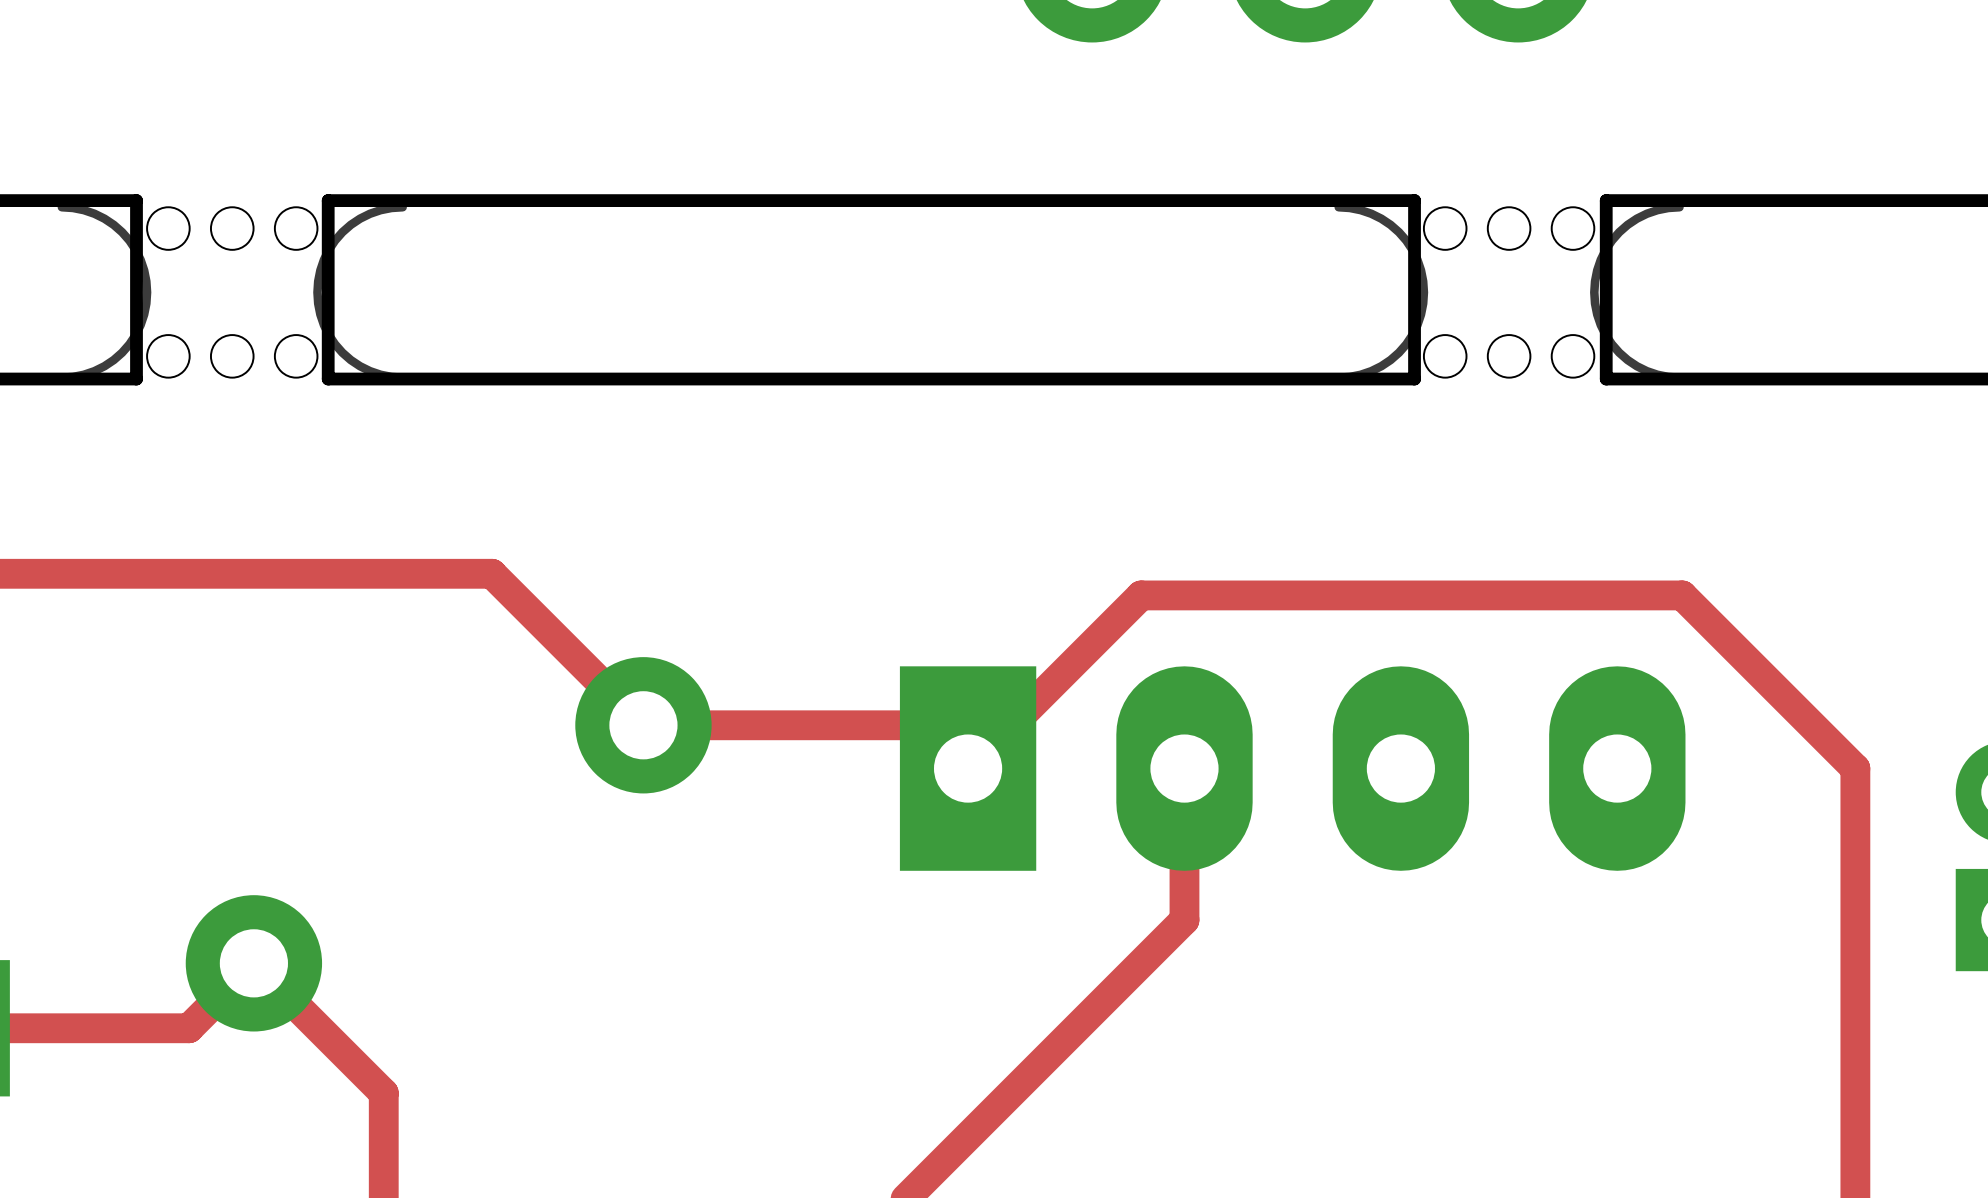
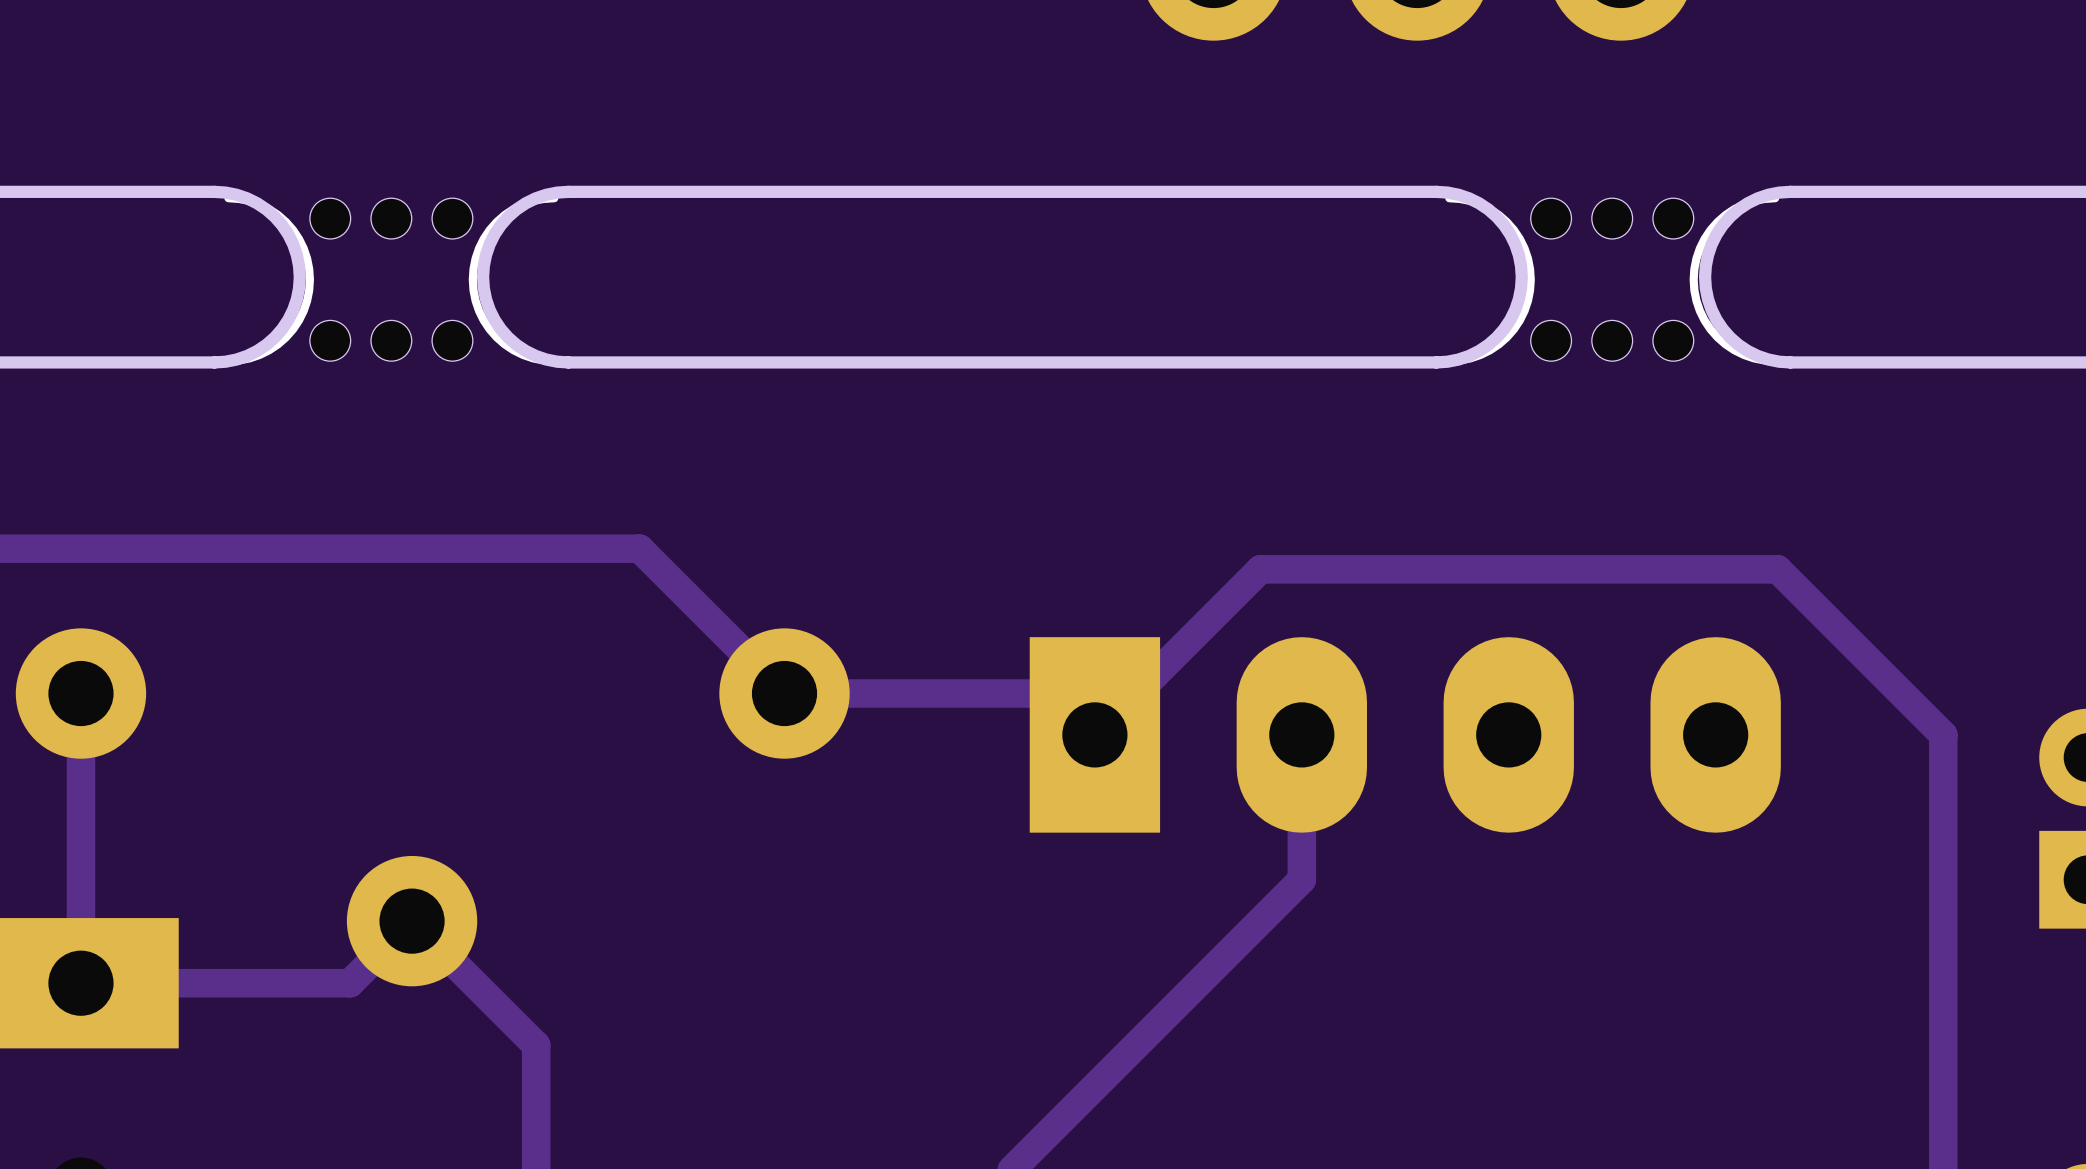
board edge: (47, 200) (136, 200) (136, 379) (47, 379) -> (214, 191) (247, 198) (274, 216) (293, 244) (299, 277) (293, 309) (274, 337) (247, 355) (214, 362)
board edge: (417, 200) (328, 200) (328, 379) (417, 379) -> (568, 191) (535, 198) (508, 216) (489, 244) (483, 277) (489, 309) (508, 337) (535, 355) (568, 362)
board edge: (1325, 200) (1414, 200) (1414, 379) (1325, 379) -> (1436, 191) (1469, 198) (1496, 216) (1515, 244) (1521, 277) (1515, 309) (1496, 337) (1469, 355) (1436, 362)
board edge: (1695, 200) (1606, 200) (1606, 379) (1695, 379) -> (1790, 191) (1757, 198) (1730, 216) (1711, 244) (1705, 277) (1711, 309) (1730, 337) (1757, 355) (1790, 362)

